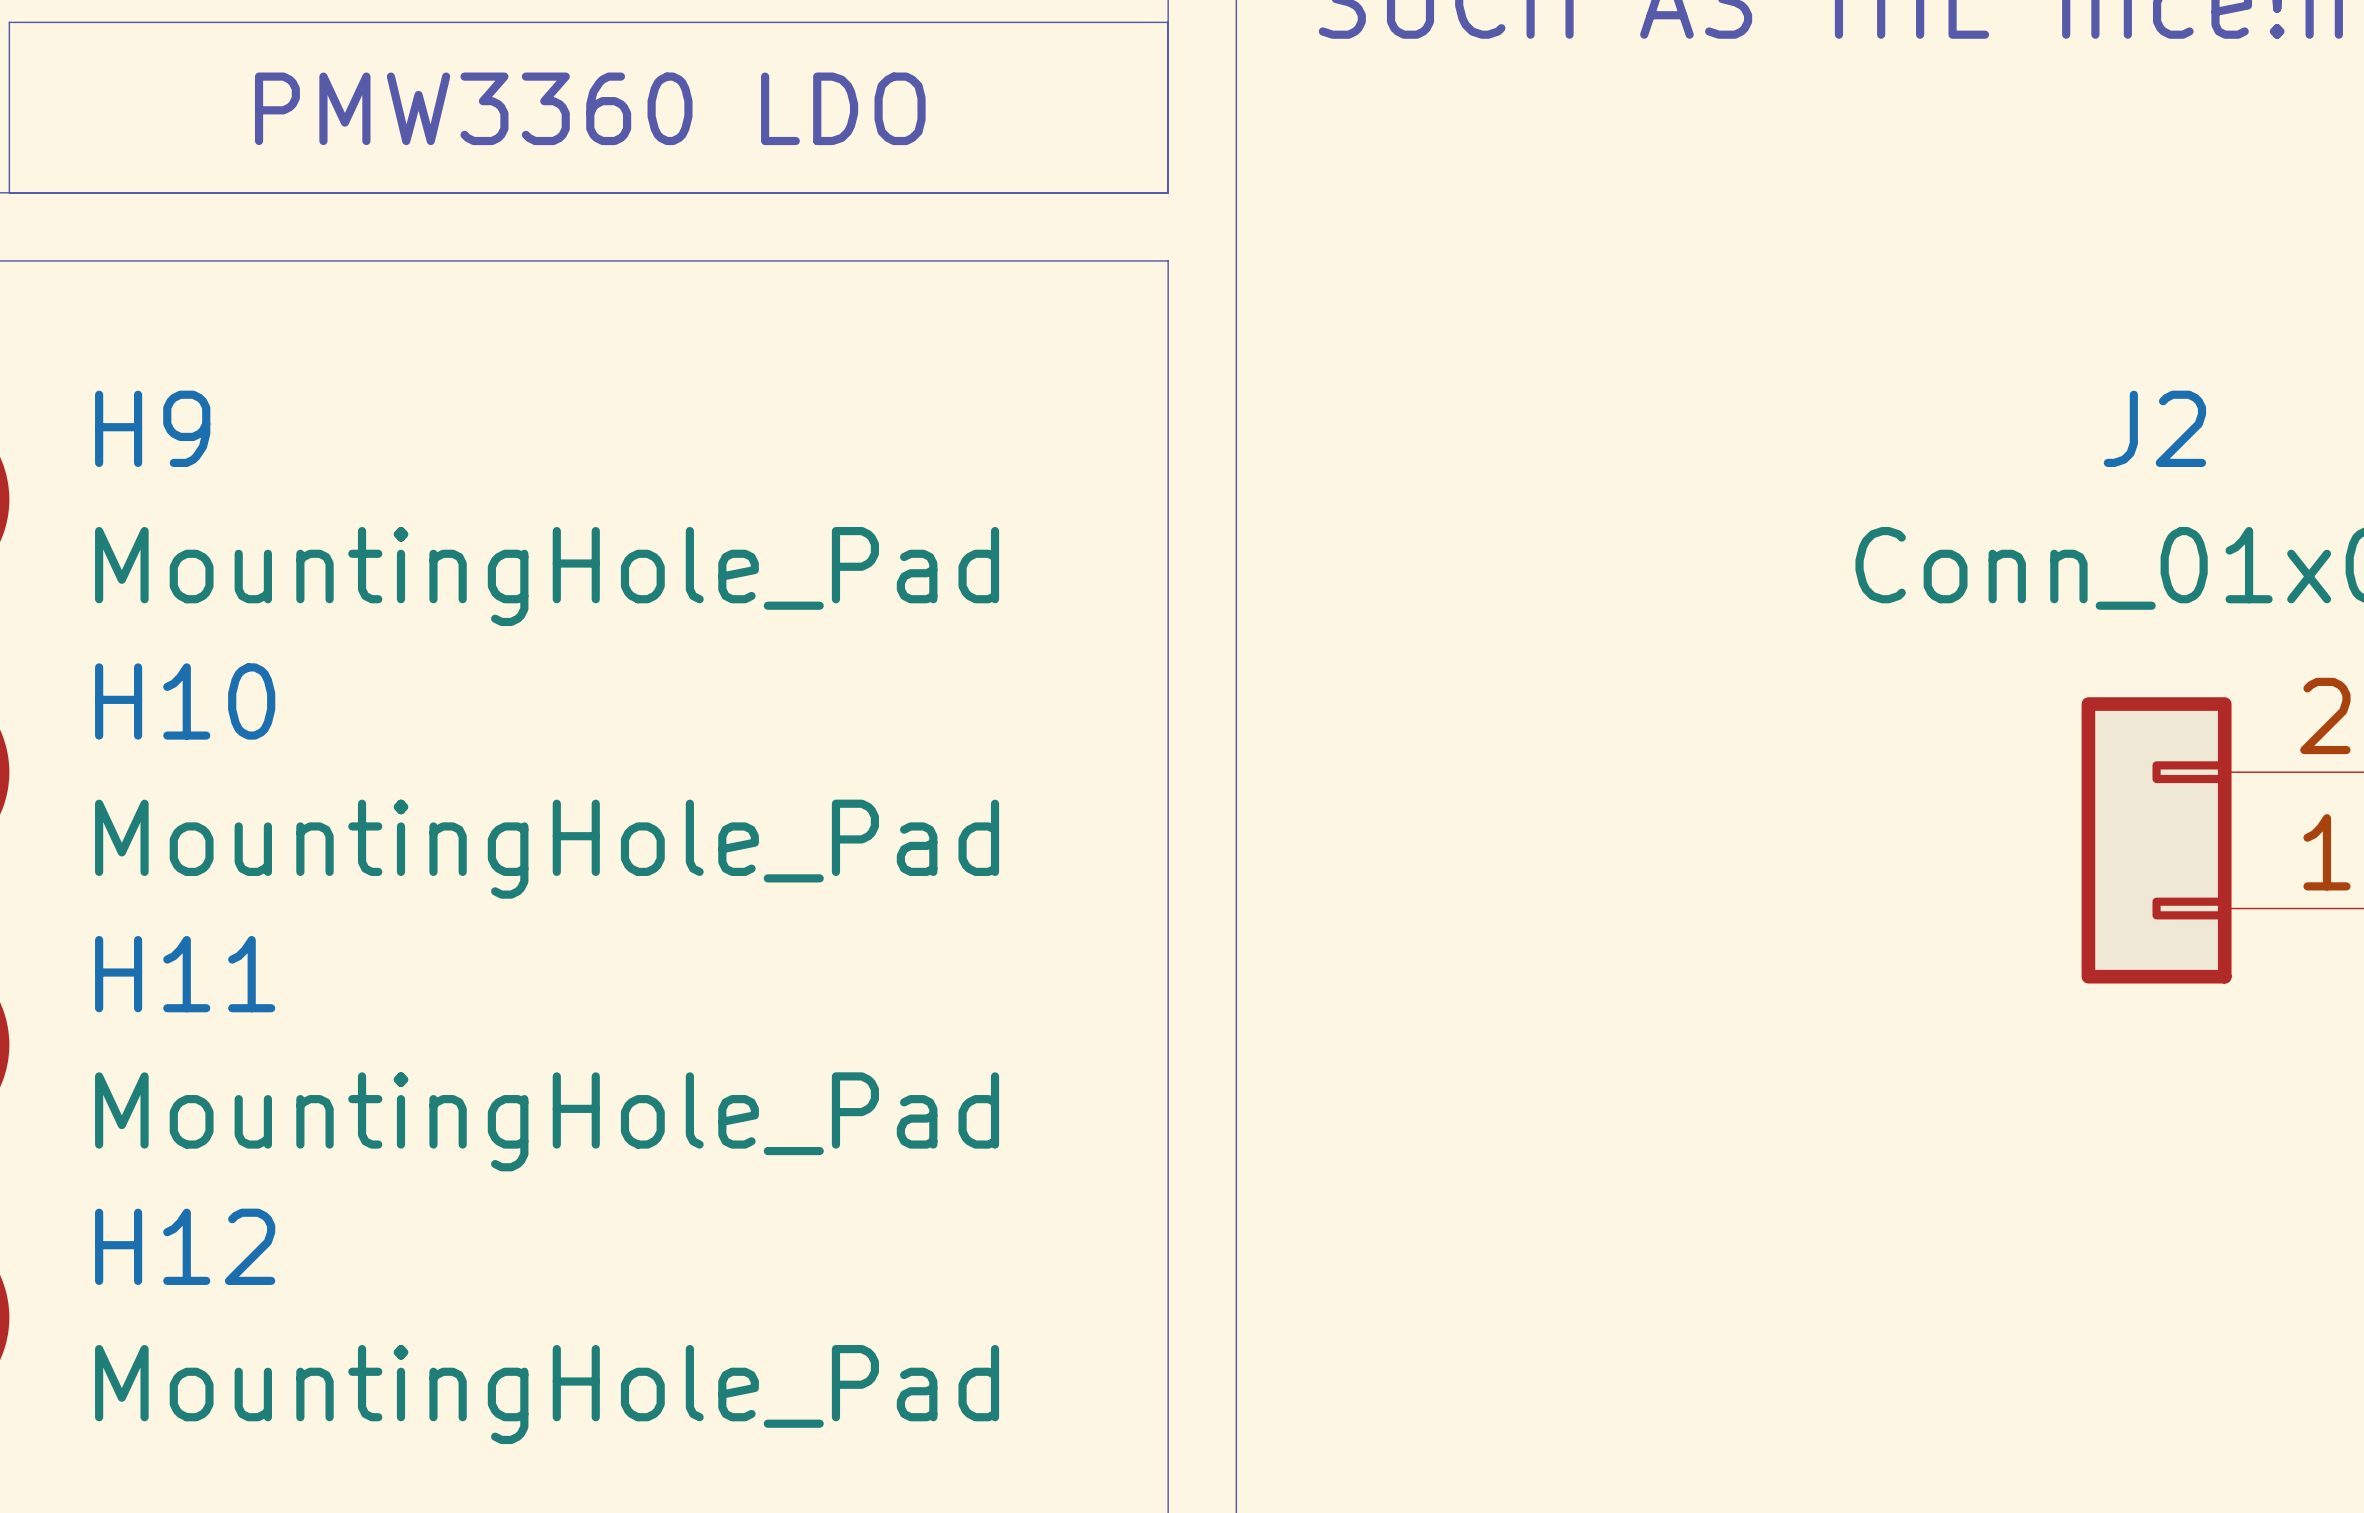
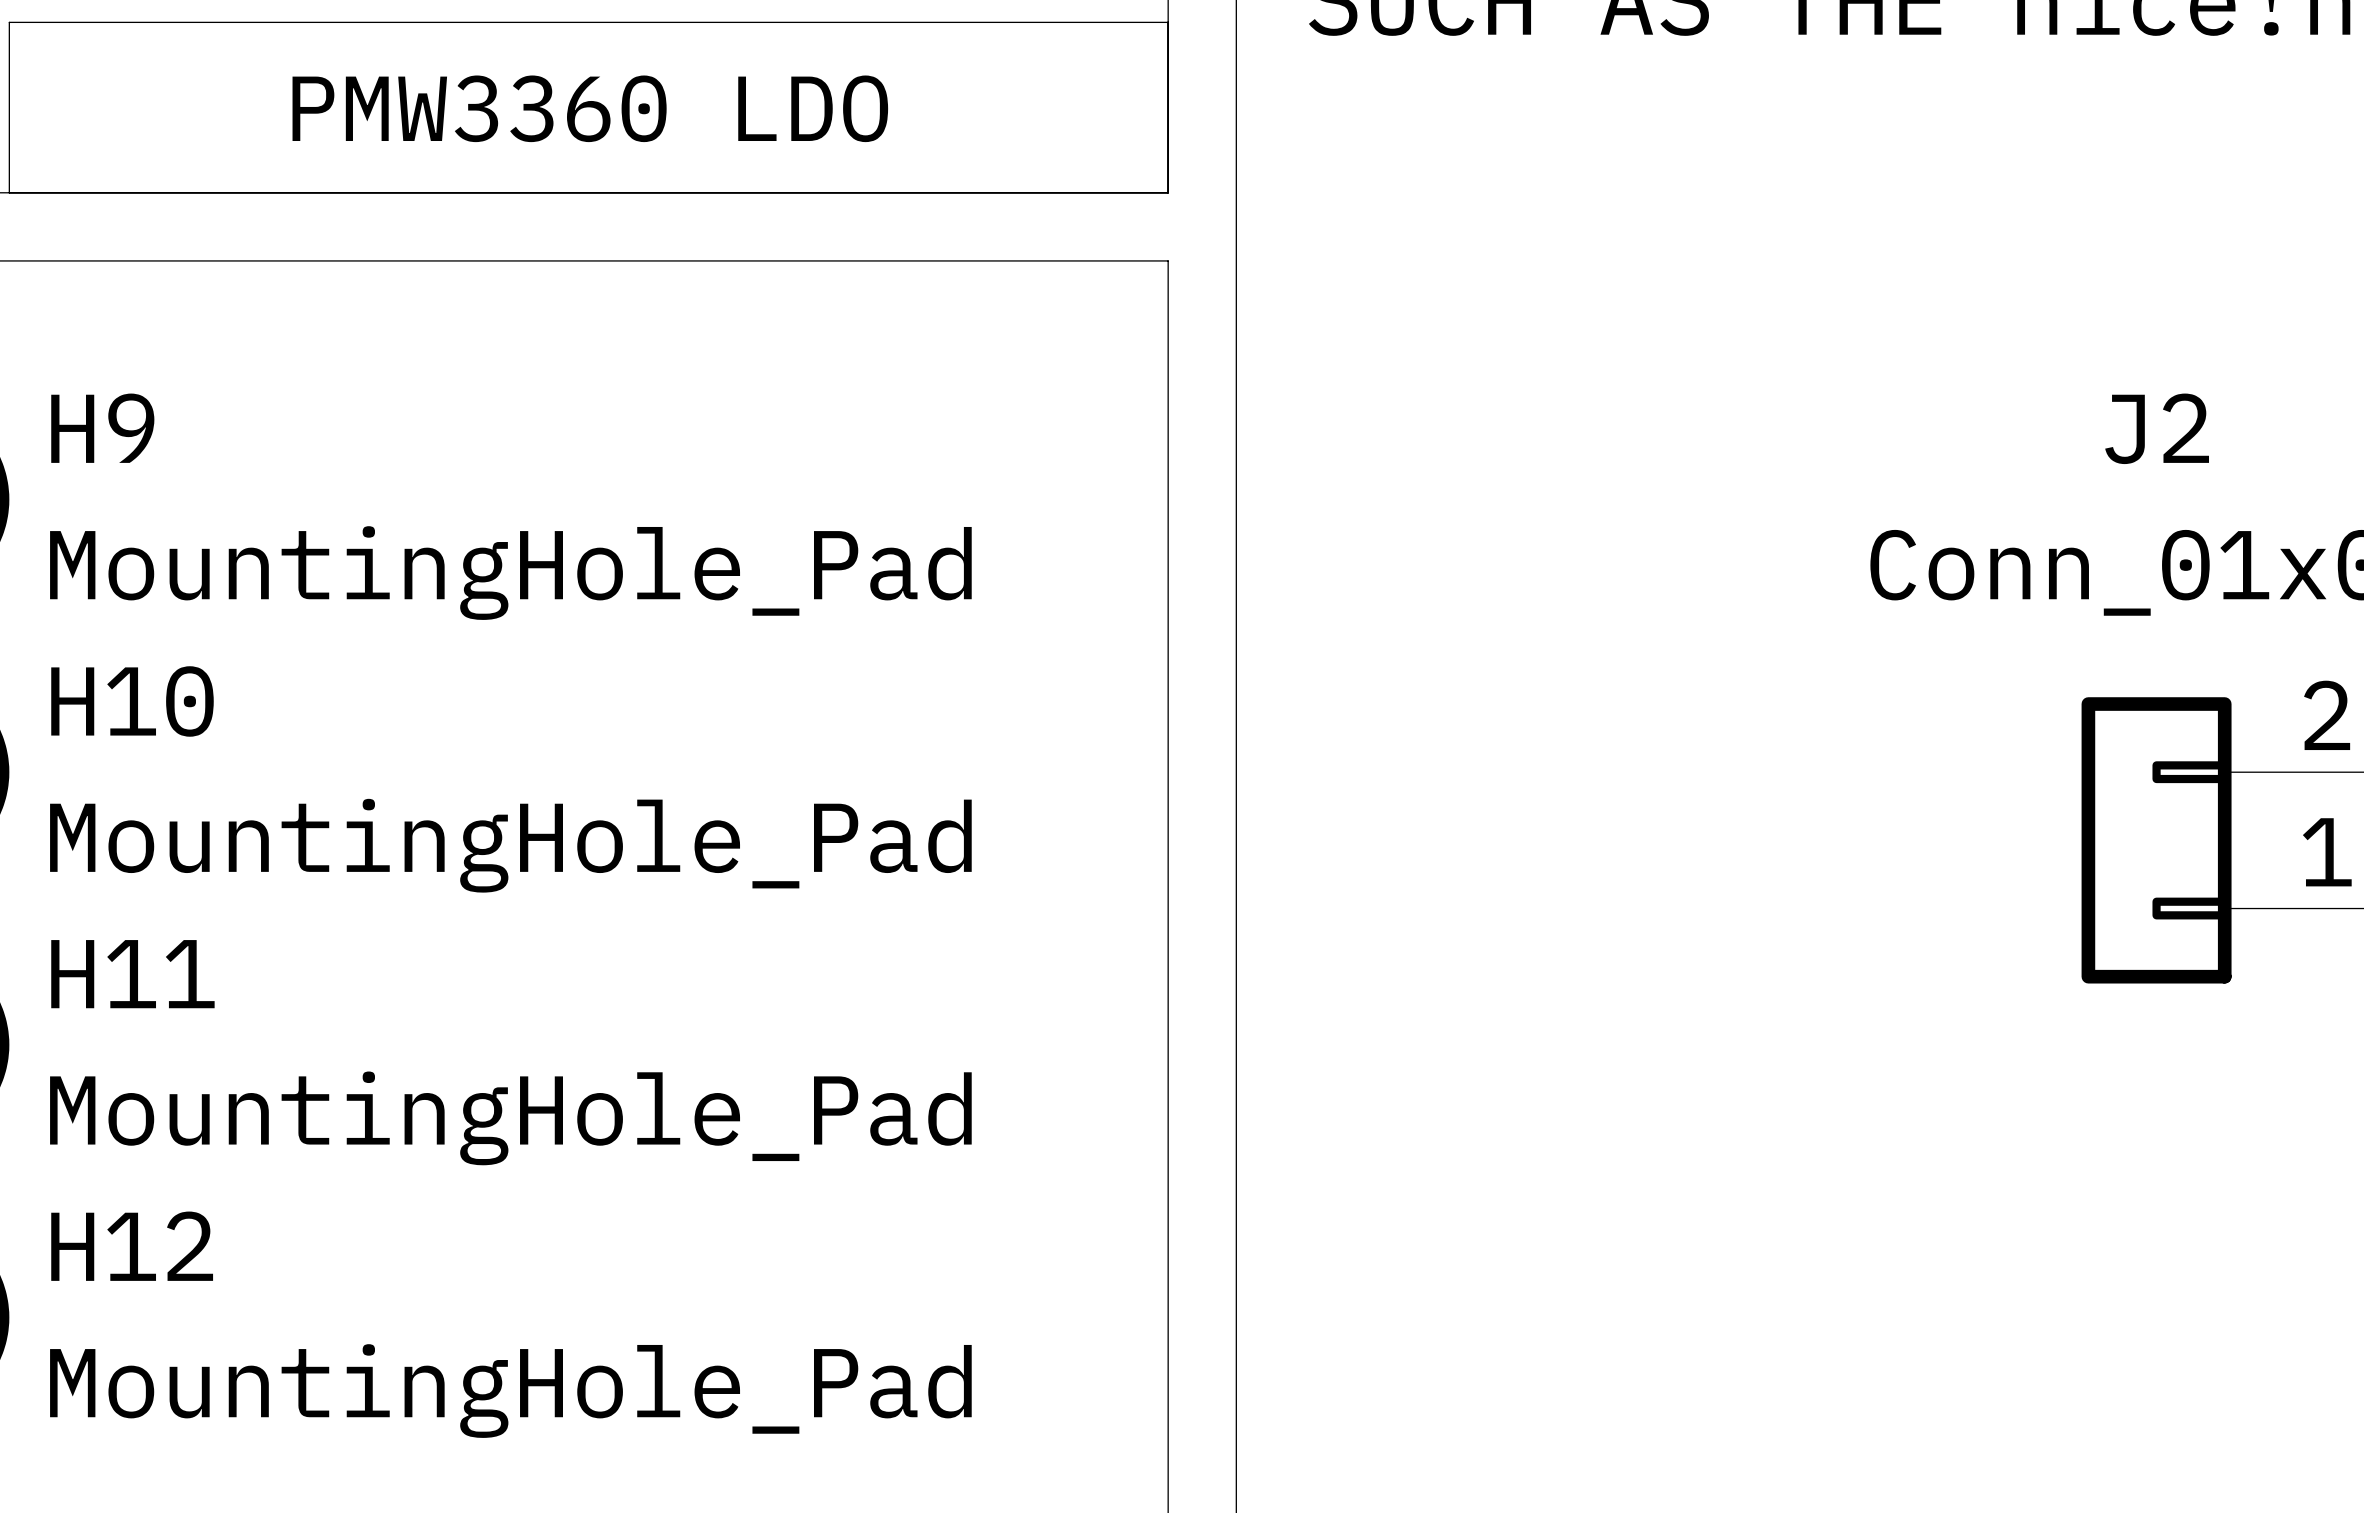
H9 name position: H9 (152, 428) -> H9 (102, 428)
H9 value position: MountingHole_Pad (547, 576) -> MountingHole_Pad (510, 573)
H10 name position: H10 (185, 701) -> H10 (132, 701)
H10 value position: MountingHole_Pad (547, 849) -> MountingHole_Pad (510, 845)
H11 name position: H11 (185, 974) -> H11 (132, 974)
H11 value position: MountingHole_Pad (547, 1121) -> MountingHole_Pad (510, 1118)
H12 name position: H12 (185, 1246) -> H12 (132, 1246)
H12 value position: MountingHole_Pad (547, 1394) -> MountingHole_Pad (510, 1391)

